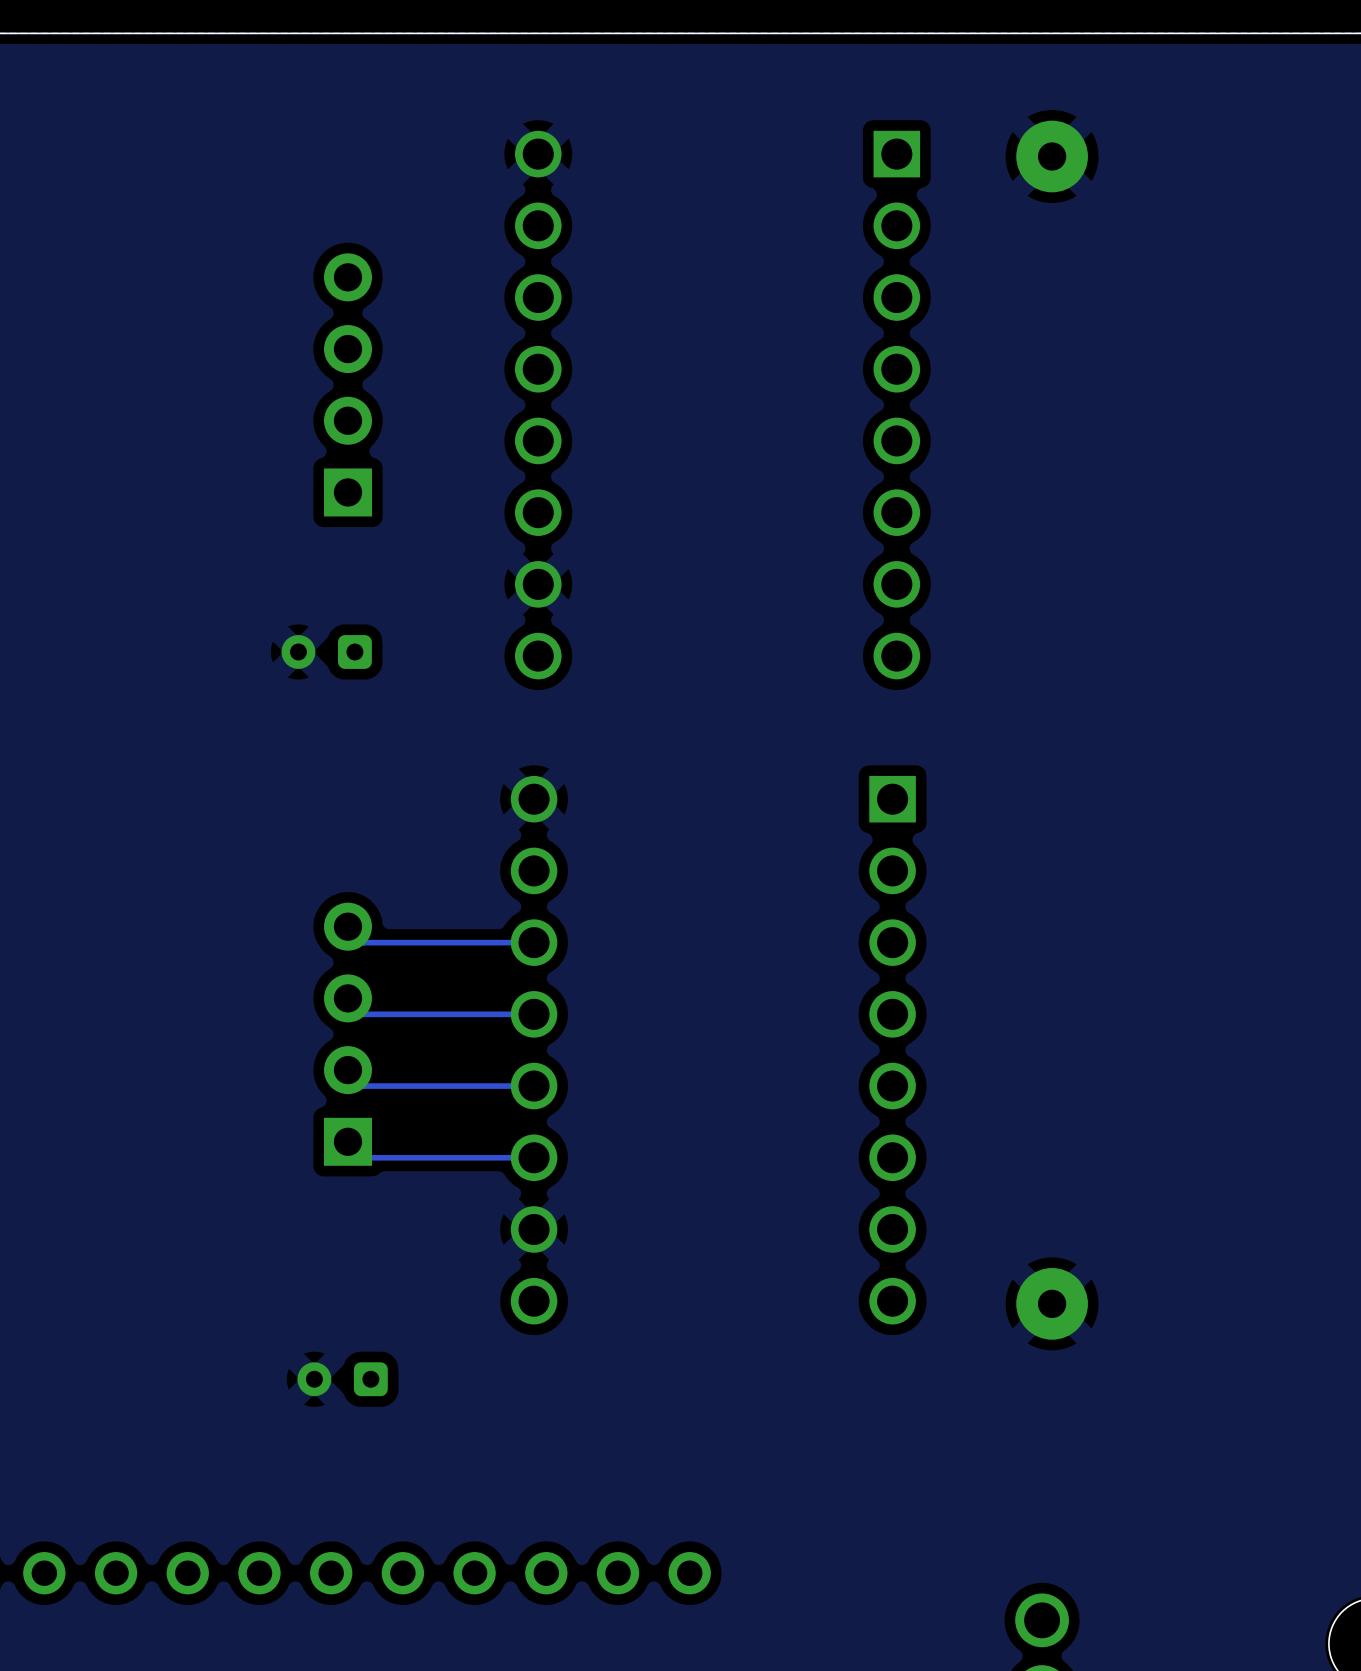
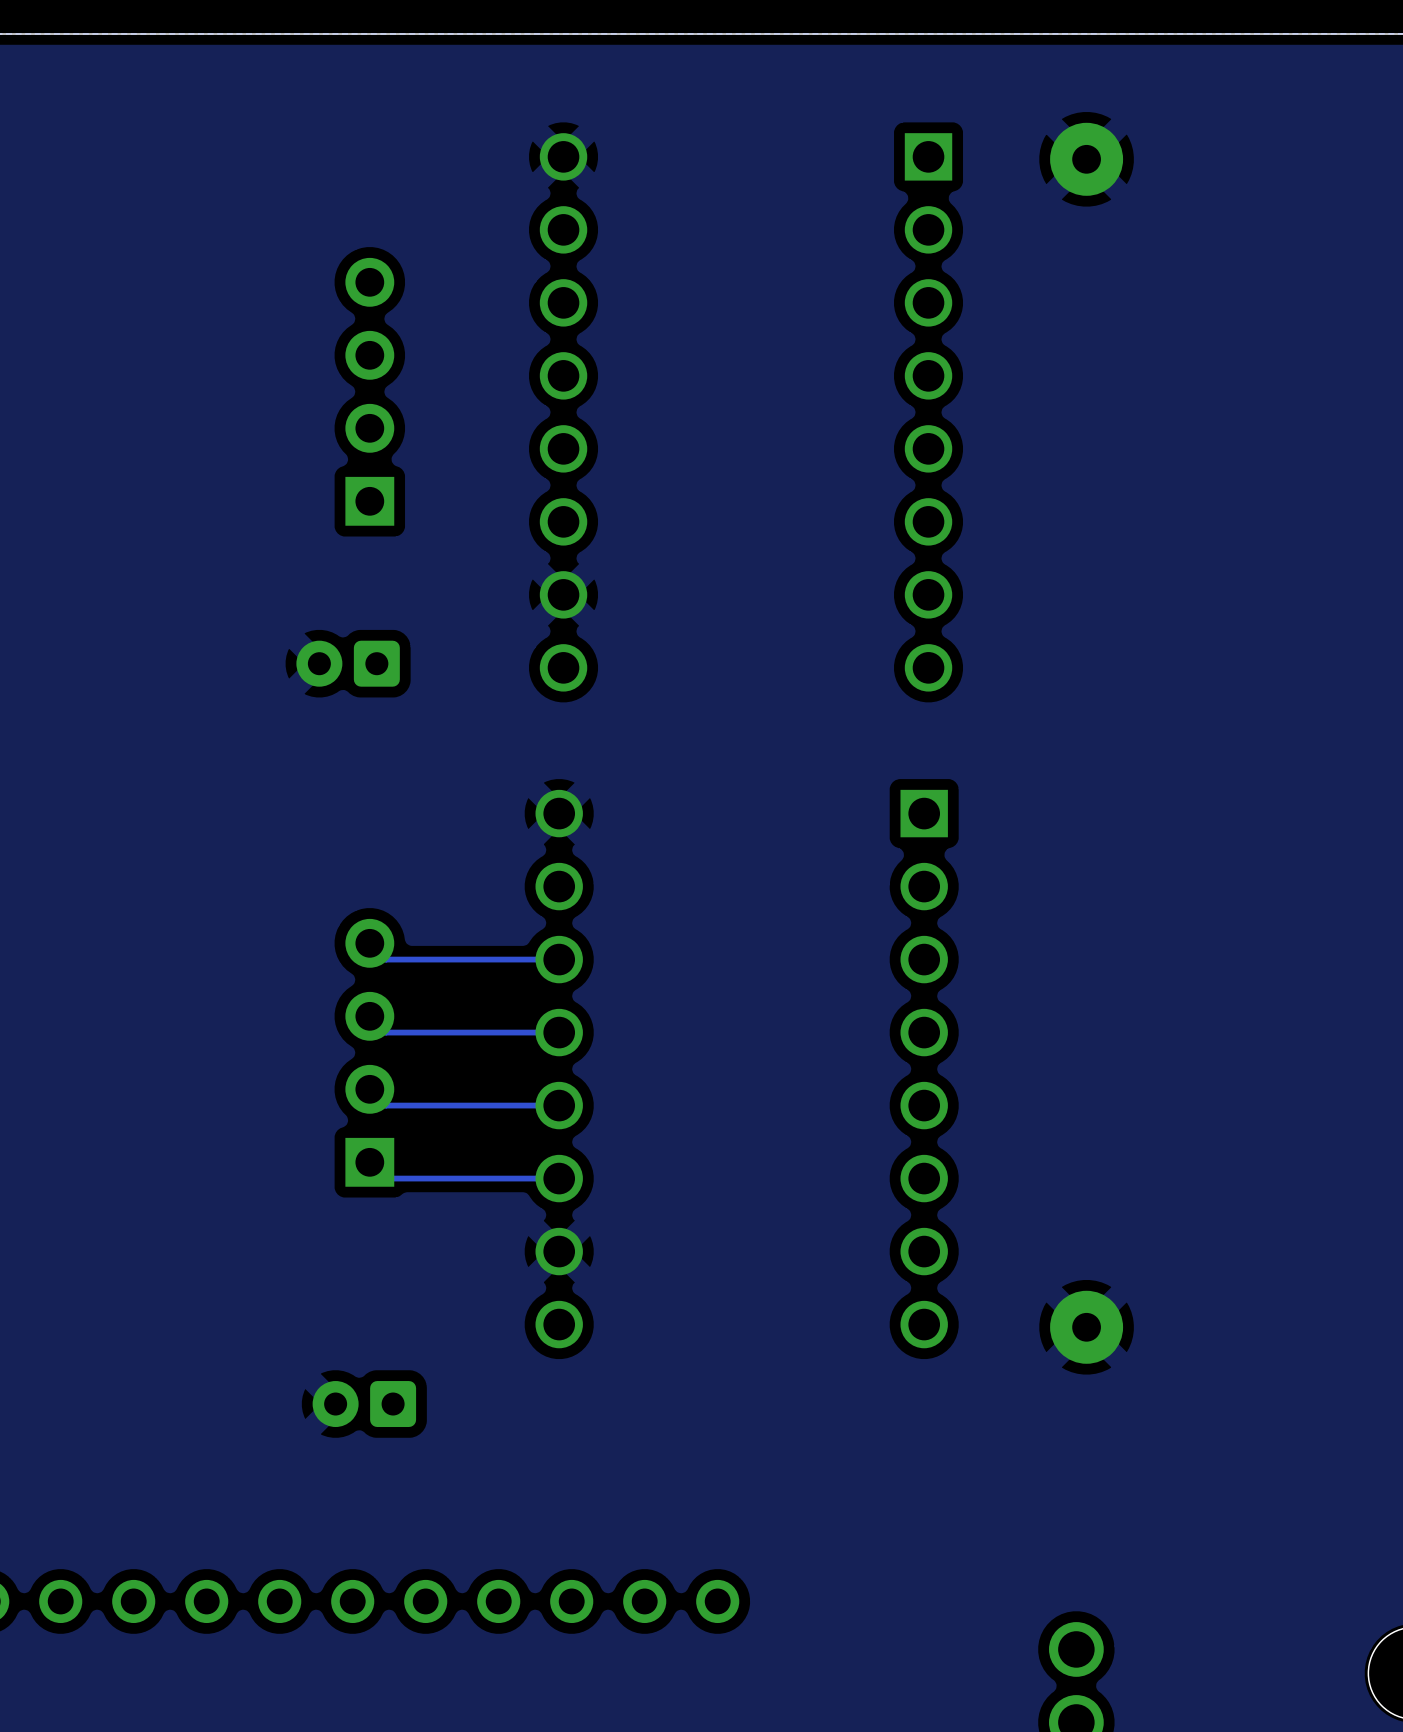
part footprint: [281, 635, 372, 669] -> [296, 640, 400, 687]
part footprint: [297, 1362, 388, 1397] -> [312, 1381, 417, 1428]

